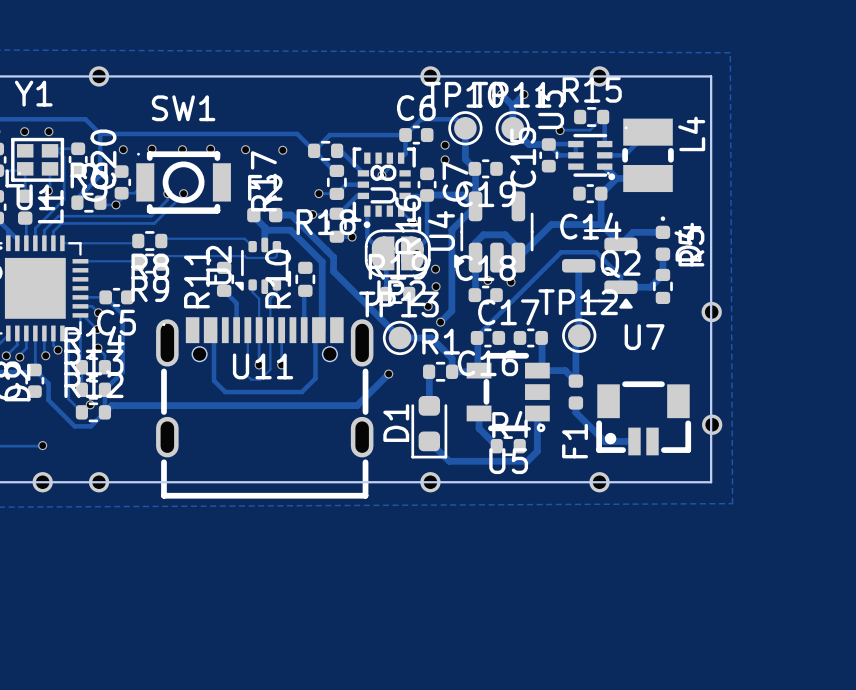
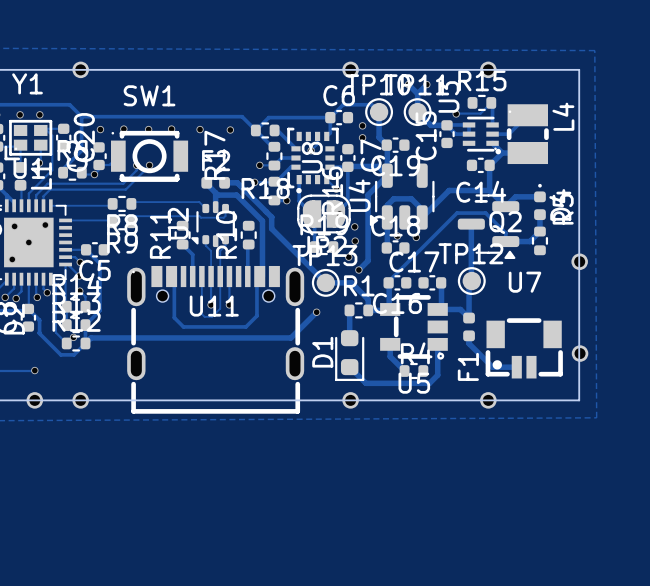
via: none -> (45, 225)
via: none -> (14, 226)
via: none -> (28, 242)
via: none -> (12, 259)

